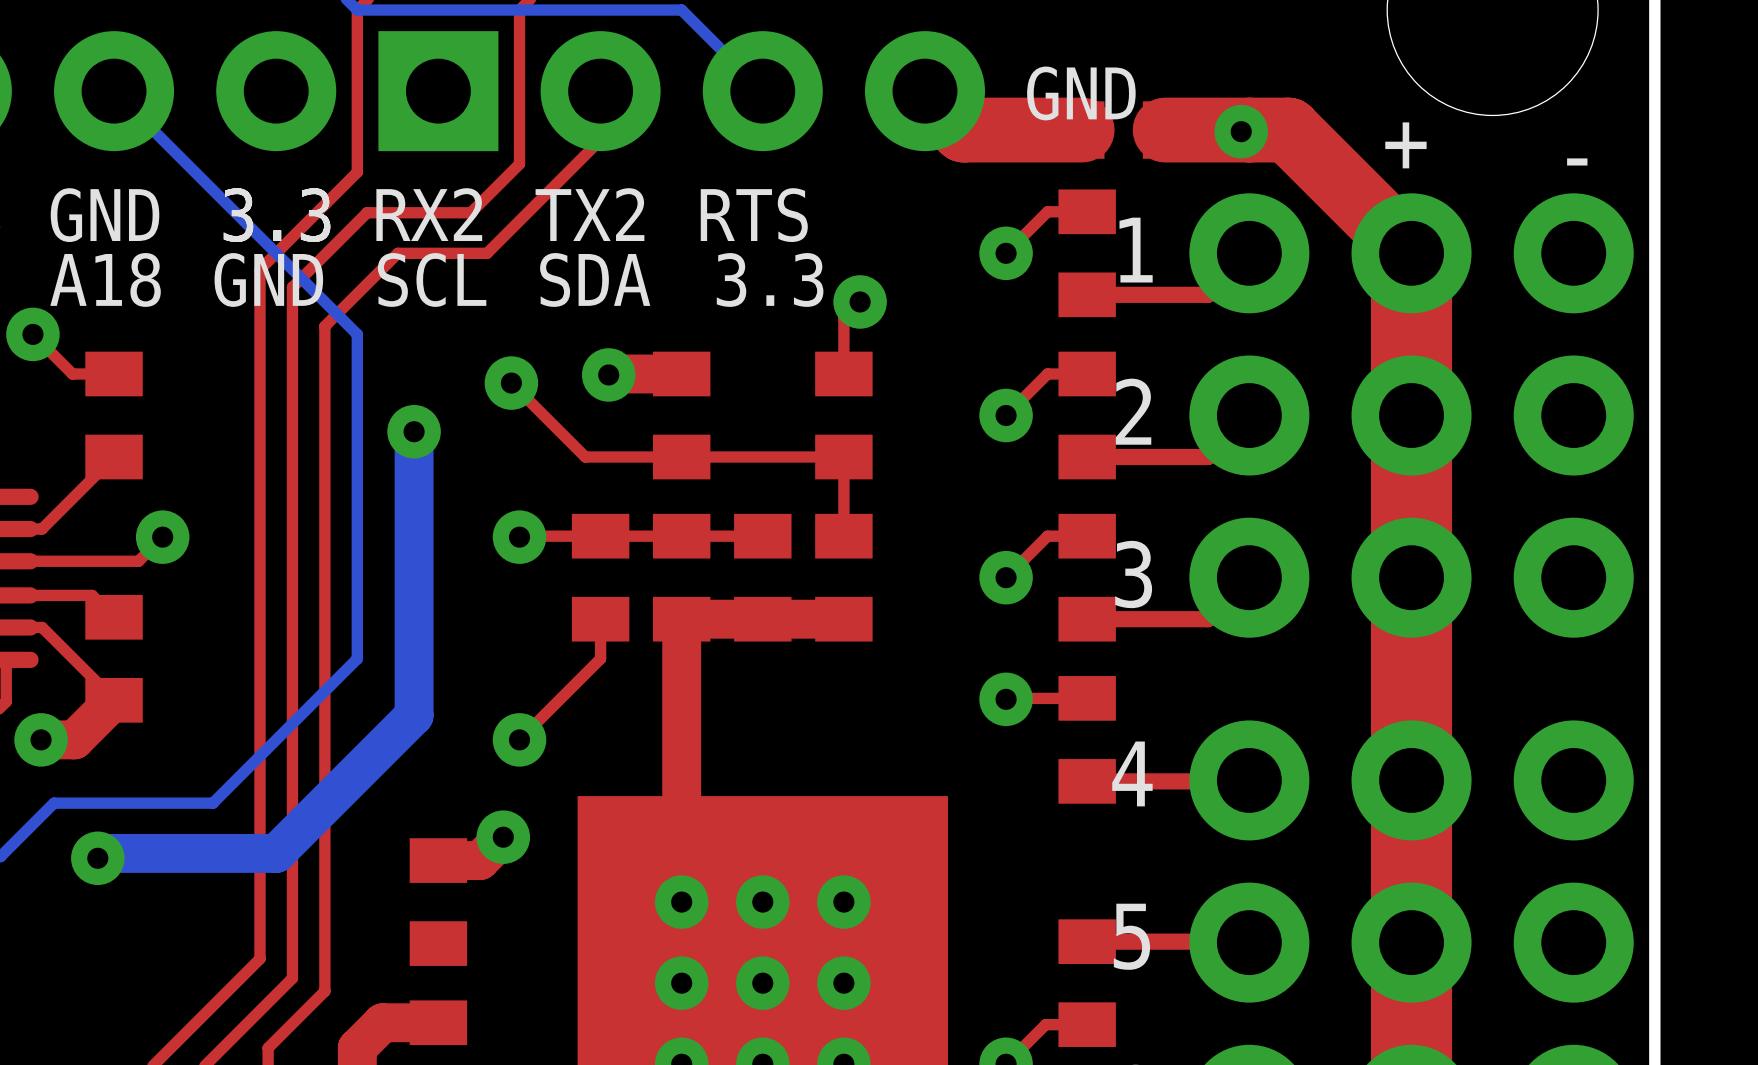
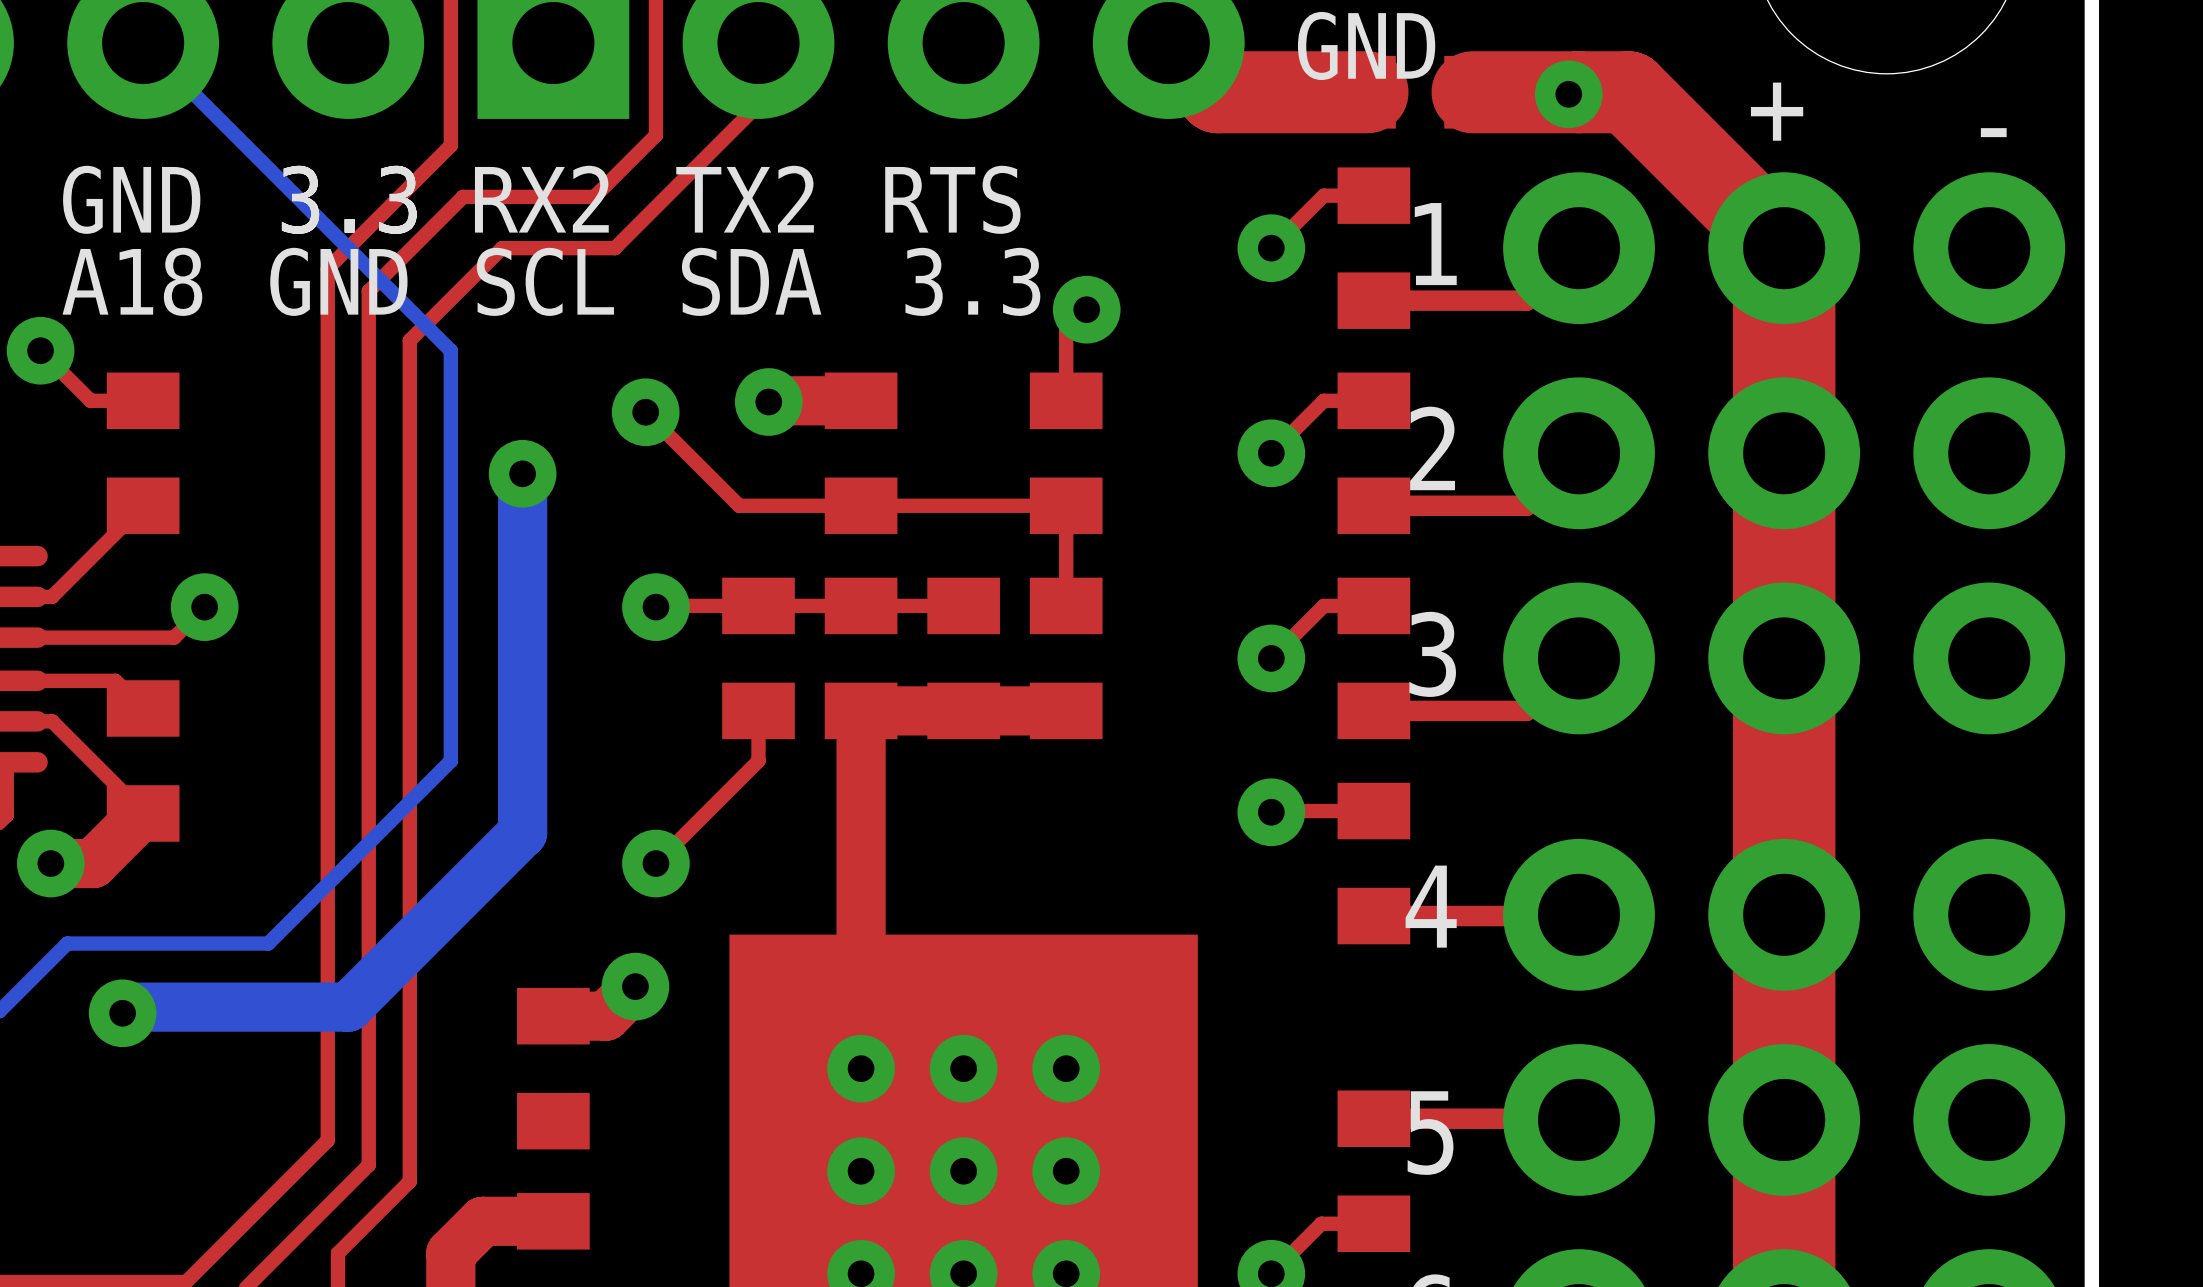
text position: 5 (1131, 936) -> 5 (1430, 1133)

